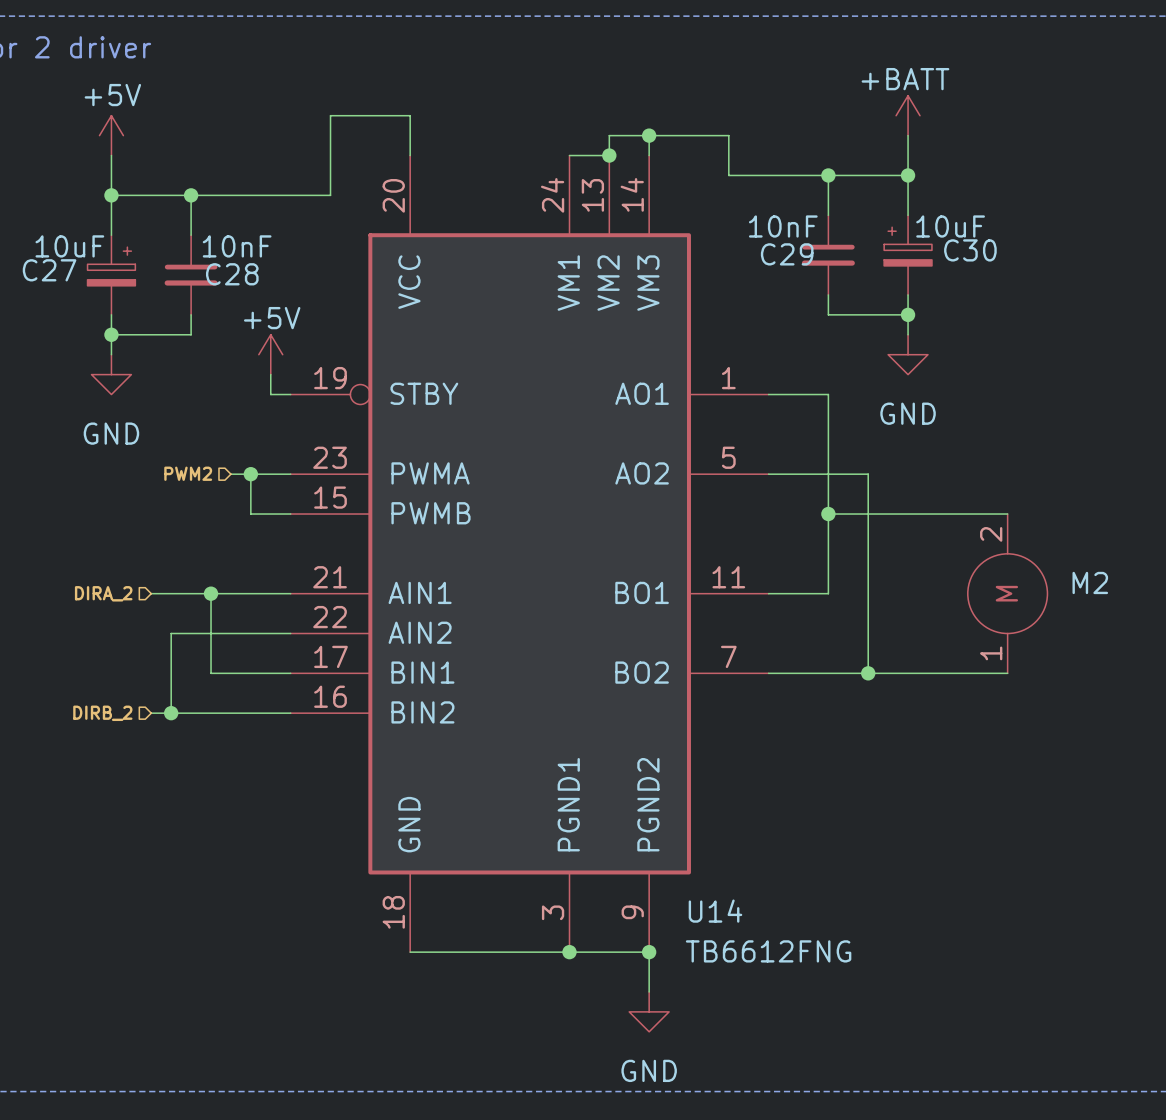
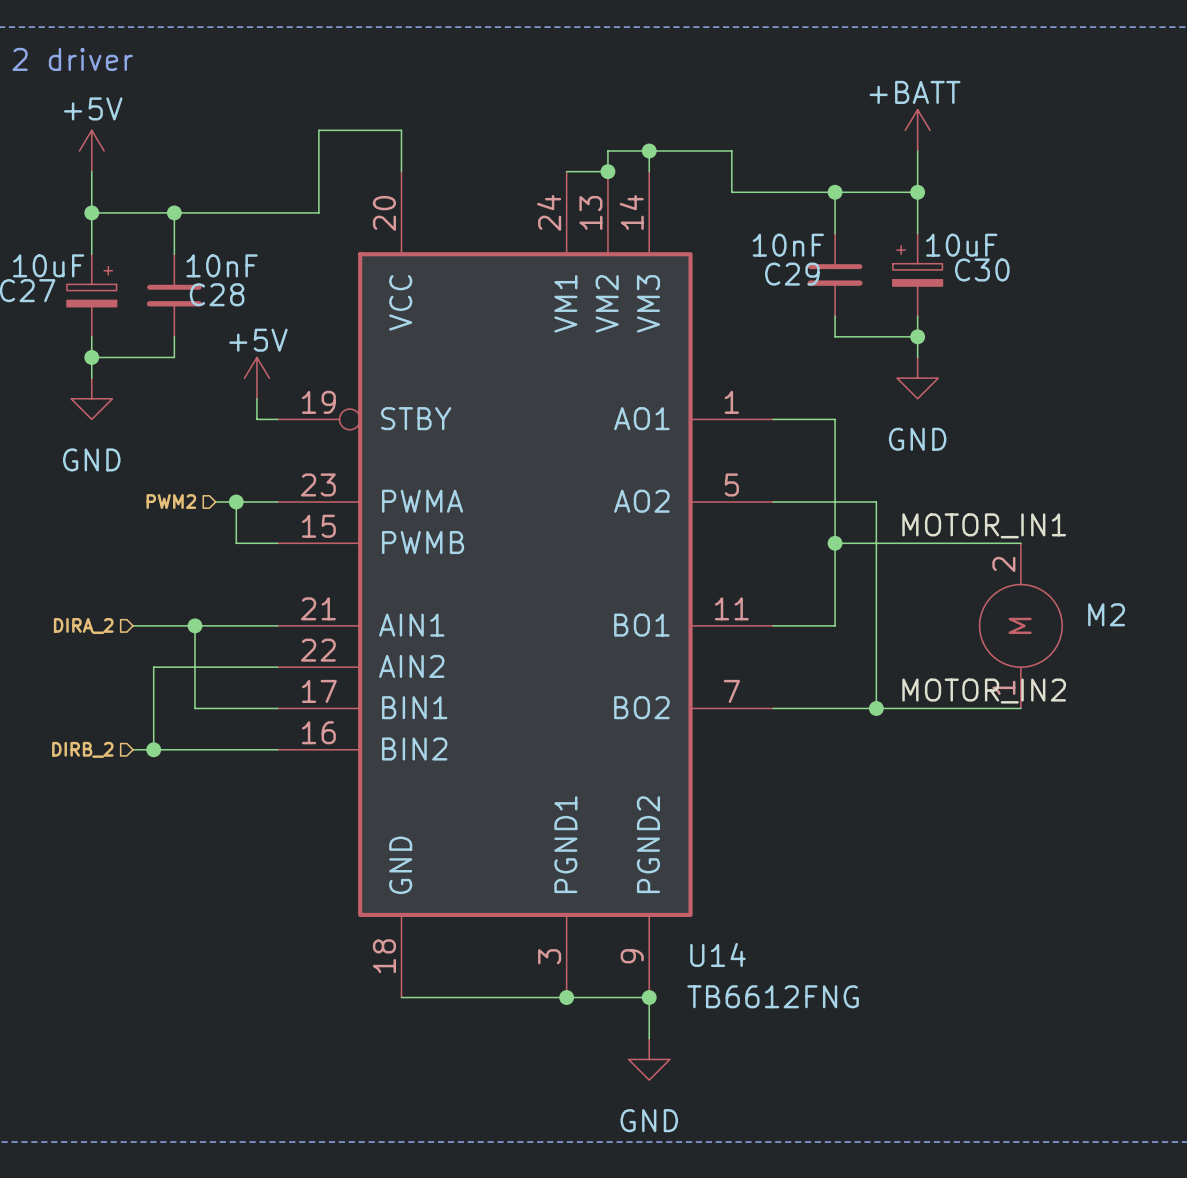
label: none -> MOTOR_IN1 (984, 525)
label: none -> MOTOR_IN2 (984, 691)

